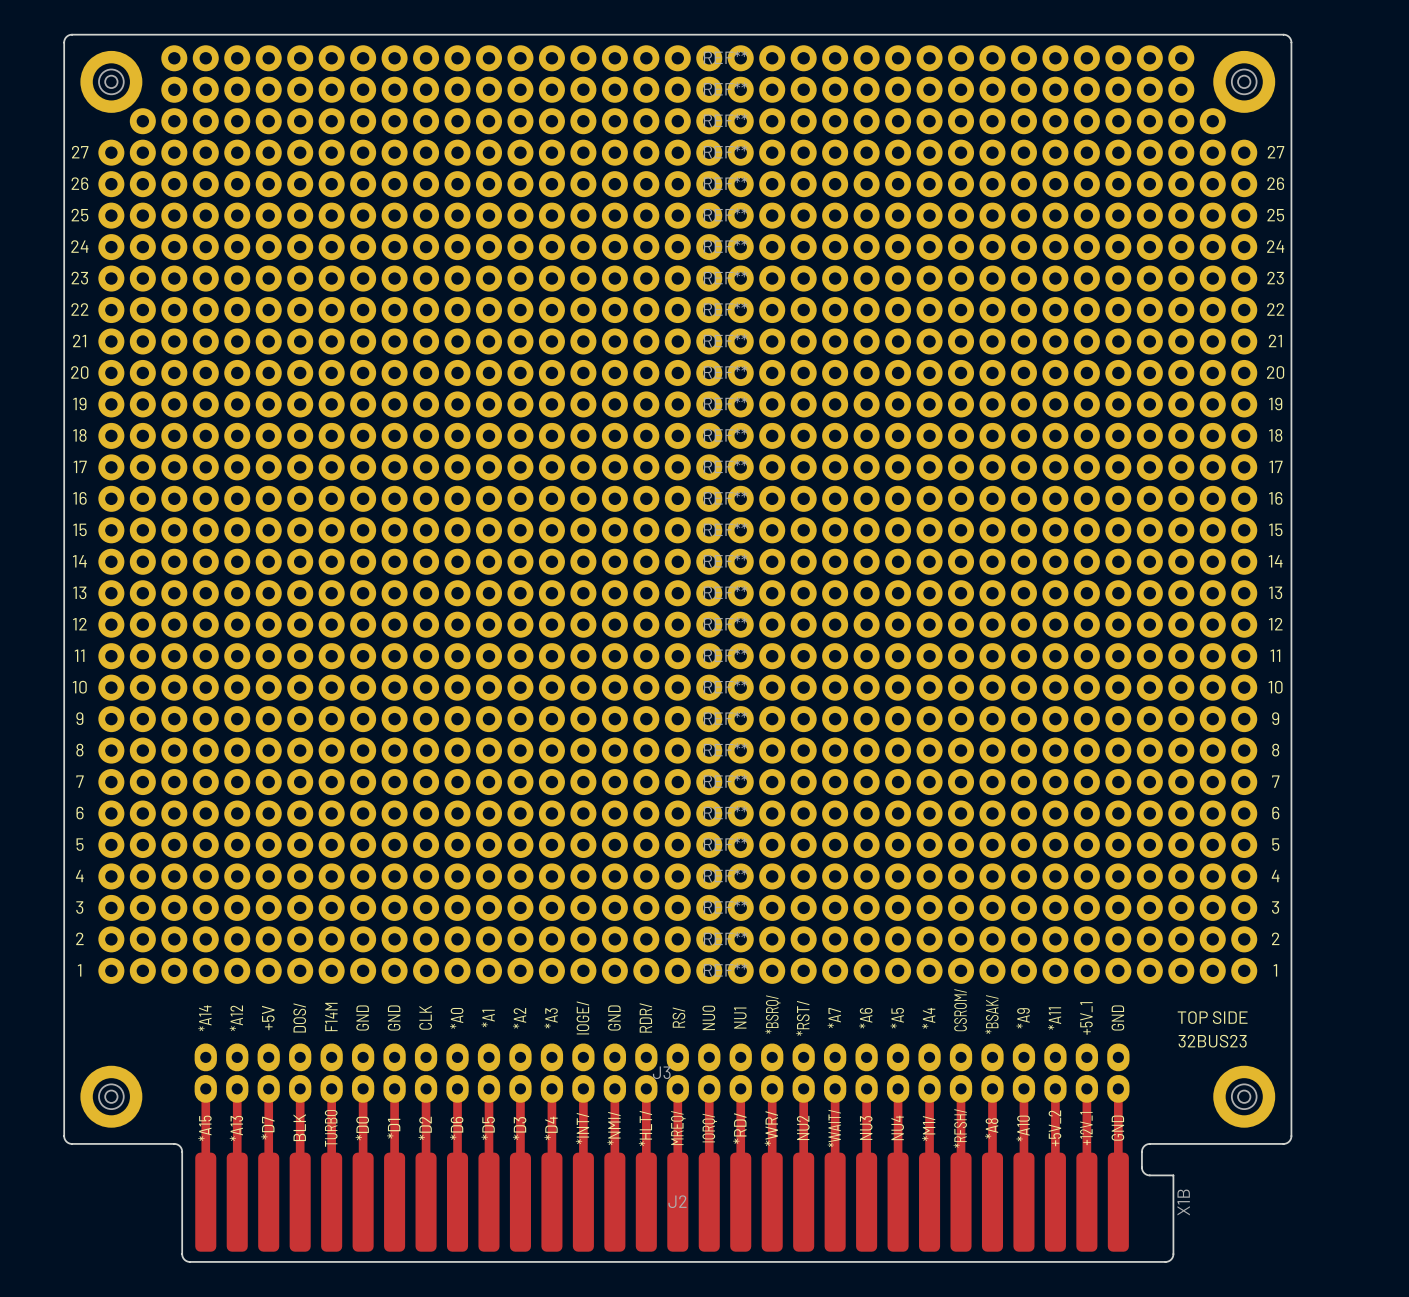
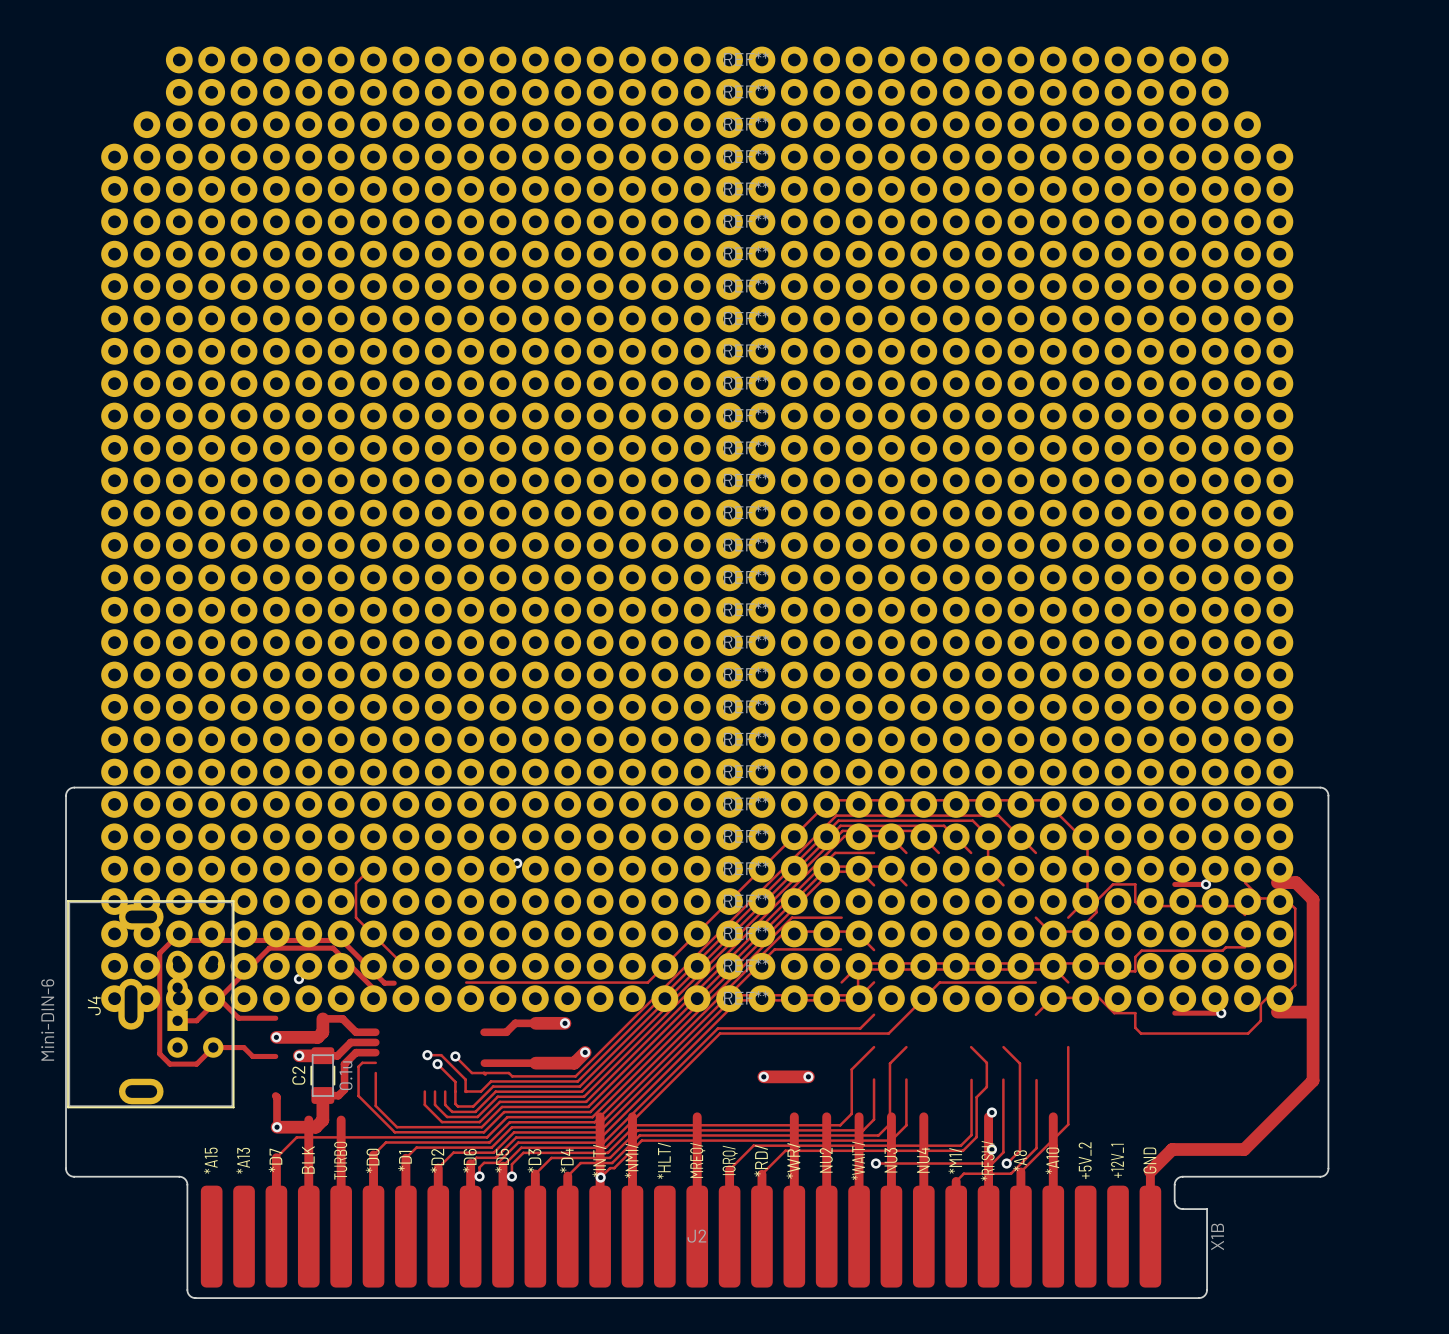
part: (111, 81) -> none
part: (1244, 81) -> none
text: 27 (80, 152) -> none
text: 27 (1276, 152) -> none
text: 26 (79, 183) -> none
text: 26 (1275, 183) -> none
text: 25 (79, 215) -> none
text: 25 (1275, 215) -> none
text: 24 (79, 246) -> none
text: 24 (1275, 246) -> none
text: 23 (79, 278) -> none
text: 23 (1275, 278) -> none
text: 22 (79, 309) -> none
text: 22 (1275, 309) -> none
text: 21 (79, 340) -> none
text: 21 (1275, 340) -> none
text: 20 (79, 372) -> none
text: 20 (1275, 372) -> none
text: 19 (79, 403) -> none
text: 19 (1275, 403) -> none
text: 18 (79, 435) -> none
text: 18 (1275, 435) -> none
text: 17 (80, 466) -> none
text: 17 (1276, 466) -> none
text: 16 (79, 498) -> none
text: 16 (1275, 498) -> none
text: 15 (79, 529) -> none
text: 15 (1275, 529) -> none
text: 14 (79, 561) -> none
text: 14 (1275, 561) -> none
text: 13 (79, 592) -> none
text: 13 (1275, 592) -> none
text: 12 (79, 624) -> none
text: 12 (1275, 624) -> none
text: 11 (79, 655) -> none
text: 11 (1275, 655) -> none
text: 10 (79, 687) -> none
text: 10 (1275, 687) -> none
text: 9 (79, 718) -> none
text: 9 (1275, 718) -> none
text: 8 (79, 750) -> none
text: 8 (1275, 750) -> none
board edge: (1291, 773) (1291, 42) (1287, 35) (69, 35) (64, 42) (64, 1136) -> (1328, 795) (1326, 789) (1320, 787) (71, 787) (67, 791) (66, 795) (66, 1168)
text: 7 (80, 781) -> none
text: 7 (1275, 781) -> none
text: 6 (80, 813) -> none
text: 6 (1275, 813) -> none
track: none -> (874, 852) (835, 852) (586, 1101) (499, 1101) (479, 1122) (442, 1122) (424, 1104) (424, 1091)
track: none -> (906, 852) (889, 836) (844, 836) (584, 1096) (497, 1096) (477, 1117) (447, 1117) (435, 1104) (435, 1091)
track: none -> (938, 852) (916, 830) (842, 830) (581, 1091) (495, 1091) (475, 1111) (452, 1111) (445, 1104) (445, 1091)
track: none -> (971, 852) (944, 825) (840, 825) (579, 1086) (493, 1086) (473, 1106) (457, 1106) (455, 1103) (455, 1081) (437, 1064)
track: none -> (1035, 852) (998, 815) (836, 815) (575, 1076) (512, 1076) (508, 1073) (471, 1073) (455, 1056)
via: none -> (517, 863)
track: none -> (372, 867) (356, 883) (356, 917) (399, 960)
text: 5 (80, 844) -> none
text: 5 (1275, 844) -> none
track: none -> (1245, 882) (1260, 898) (1285, 898) (1295, 908) (1295, 985) (1285, 995) (1269, 995) (1260, 1004) (1260, 1020) (1248, 1033) (1141, 1033) (1135, 1027) (1135, 1013) (1114, 1013) (1098, 997) (1052, 997) (1035, 1014)
track: none -> (1174, 884) (1206, 884)
via: none -> (1206, 884)
track: none -> (874, 885) (860, 871) (830, 871) (590, 1112) (504, 1112) (483, 1132) (394, 1132) (358, 1095) (358, 1066) (362, 1062) (375, 1062)
track: none -> (906, 885) (887, 866) (828, 866) (588, 1106) (502, 1106) (481, 1127) (396, 1127) (375, 1105) (375, 1073)
track: none -> (1003, 885) (988, 869) (988, 836) (972, 820) (838, 820) (577, 1081) (491, 1081) (481, 1091) (465, 1091) (465, 1079) (441, 1055) (427, 1055)
text: 4 (79, 875) -> none
text: 4 (1275, 875) -> none
track: none -> (1245, 914) (1236, 906) (1139, 906) (1135, 901) (1135, 884) (1112, 884) (1096, 900) (1096, 912) (1077, 931) (1049, 931) (1035, 917)
track: none -> (1068, 917) (1087, 898) (1087, 843) (1044, 800) (830, 800) (647, 982) (466, 982)
text: 3 (79, 907) -> none
text: 3 (1275, 907) -> none
track: none -> (1245, 947) (1225, 947) (1222, 950) (1141, 950) (1135, 957) (1135, 971) (1113, 971) (1105, 963) (860, 963) (841, 982)
text: 2 (79, 938) -> none
text: 2 (1275, 938) -> none
via: none -> (298, 979)
track: none -> (394, 983) (384, 983) (341, 940) (172, 940) (159, 953) (159, 1053) (169, 1064) (196, 1064) (213, 1047) (243, 1047) (252, 1056) (275, 1056)
text: 1 (79, 970) -> none
track: none -> (219, 998) (238, 1018) (275, 1018)
text: 1 (1275, 970) -> none
track: none -> (375, 1001) (375, 990) (333, 948) (269, 948) (196, 1020) (177, 1020)
J4: none -> Mini-DIN-6 (150, 1004)
track: none -> (1277, 1012) (1311, 1012)
track: none -> (1174, 1013) (1221, 1013)
via: none -> (1221, 1013)
track: none -> (874, 1014) (860, 1028) (717, 1028) (603, 1142) (518, 1142) (498, 1162) (484, 1162) (479, 1167) (479, 1176)
track: none -> (565, 1023) (515, 1023) (506, 1032) (484, 1032)
via: none -> (565, 1023)
track: none -> (375, 1032) (356, 1032) (342, 1018) (322, 1018) (322, 1032) (317, 1037) (276, 1037)
via: none -> (276, 1037)
text: CSROM/ (960, 1010) -> none
track: none -> (375, 1042) (350, 1042) (337, 1055) (299, 1055)
text: *BSRQ/ (772, 1014) -> none
text: *BSAK/ (991, 1014) -> none
text: F14M (331, 1016) -> none
text: DOS/ (299, 1017) -> none
text: GND (362, 1017) -> none
text: GND (394, 1017) -> none
text: CLK (425, 1017) -> none
text: IOGE/ (582, 1017) -> none
text: GND (614, 1017) -> none
text: RDR/ (645, 1017) -> none
text: RS/ (678, 1017) -> none
text: NU0 (708, 1017) -> none
text: *A7 (834, 1017) -> none
track: none -> (874, 1047) (851, 1069) (851, 1113) (840, 1125) (635, 1125) (607, 1152) (523, 1152) (511, 1164) (511, 1176)
track: none -> (1003, 1047) (1019, 1063) (1019, 1150) (1006, 1163)
text: GND (1117, 1017) -> none
text: TOP SIDE (1212, 1017) -> none
text: *A14 (204, 1018) -> none
text: *A12 (236, 1018) -> none
text: +5V (268, 1018) -> none
text: *A0 (456, 1018) -> none
text: *A1 (488, 1018) -> none
text: *A2 (519, 1018) -> none
text: *A3 (551, 1018) -> none
text: NU1 (740, 1018) -> none
text: *RST/ (802, 1018) -> none
text: *A6 (865, 1018) -> none
text: *A5 (897, 1018) -> none
text: *A4 (928, 1018) -> none
text: *A9 (1023, 1018) -> none
text: *A11 (1054, 1018) -> none
text: +5V_1 (1086, 1018) -> none
track: none -> (375, 1052) (356, 1052) (344, 1064) (344, 1089) (338, 1095) (322, 1095) (322, 1120) (315, 1127) (277, 1127)
track: none -> (585, 1052) (574, 1063) (484, 1062)
via: none -> (585, 1052)
via: none -> (427, 1055)
via: none -> (299, 1055)
via: none -> (455, 1056)
via: none -> (437, 1064)
text: 32BUS23 (1212, 1041) -> none
track: none -> (484, 1073) (485, 1074)
C2: none -> 0.1u (322, 1075)
track: none -> (763, 1076) (808, 1076)
via: none -> (763, 1076)
via: none -> (808, 1076)
track: none -> (906, 1079) (906, 1125) (891, 1140) (641, 1140) (614, 1168) (610, 1168) (600, 1177)
track: none -> (1003, 1079) (1003, 1152) (992, 1163) (875, 1163)
track: none -> (275, 1095) (276, 1127)
J3: (662, 1073) -> none
via: none -> (991, 1112)
track: (426, 1085) (426, 1135) -> (1068, 982) (1055, 969) (864, 969) (858, 976) (858, 988) (851, 995) (736, 995) (598, 1132) (514, 1132) (493, 1152) (453, 1152) (438, 1167)
track: (457, 1085) (457, 1131) -> (874, 982) (856, 1000) (738, 1000) (601, 1137) (516, 1137) (495, 1157) (476, 1157) (470, 1163)
track: (488, 1085) (488, 1133) -> (1035, 982) (939, 982) (888, 1033) (720, 1033) (605, 1147) (521, 1147) (503, 1166)
track: (520, 1085) (520, 1141) -> (874, 1079) (874, 1119) (863, 1130) (637, 1130) (610, 1157) (551, 1157) (535, 1174)
track: (551, 1085) (551, 1143) -> (906, 1047) (889, 1063) (889, 1124) (878, 1135) (639, 1135) (612, 1163) (580, 1163) (567, 1176)
track: (646, 1085) (646, 1199) -> none
track: (709, 1085) (709, 1137) -> (971, 1079) (971, 1135) (960, 1145) (753, 1145) (729, 1169)
track: (740, 1085) (740, 1141) -> (971, 1047) (986, 1062) (986, 1087) (976, 1097) (976, 1137) (963, 1150) (785, 1150) (761, 1174)
track: (929, 1085) (929, 1148) -> (1036, 1080) (1036, 1148) (1011, 1173) (963, 1173) (956, 1181)
track: (992, 1085) (992, 1139) -> (1068, 1047) (1068, 1124) (1020, 1171)
track: (1055, 1085) (1055, 1199) -> none
track: (1086, 1085) (1086, 1199) -> none
track: (1118, 1085) (1118, 1138) -> (1277, 882) (1295, 882) (1313, 899) (1313, 1080) (1244, 1149) (1172, 1149) (1150, 1171)
track: (205, 1088) (205, 1202) -> none
track: (237, 1088) (237, 1202) -> none
track: (268, 1088) (268, 1125) -> (841, 917) (792, 917) (592, 1117) (507, 1117) (487, 1137) (296, 1137) (276, 1157)
track: (363, 1088) (363, 1122) -> (874, 950) (855, 931) (785, 931) (594, 1122) (509, 1122) (489, 1142) (385, 1142) (373, 1154)
track: (394, 1088) (394, 1125) -> (841, 949) (774, 949) (596, 1127) (511, 1127) (491, 1147) (416, 1147) (405, 1158)
via: none -> (277, 1127)
part: (111, 1096) -> none
part: (1244, 1096) -> none
via: none -> (991, 1149)
via: none -> (875, 1163)
via: none -> (1006, 1163)
via: none -> (479, 1176)
via: none -> (511, 1176)
via: none -> (600, 1177)

